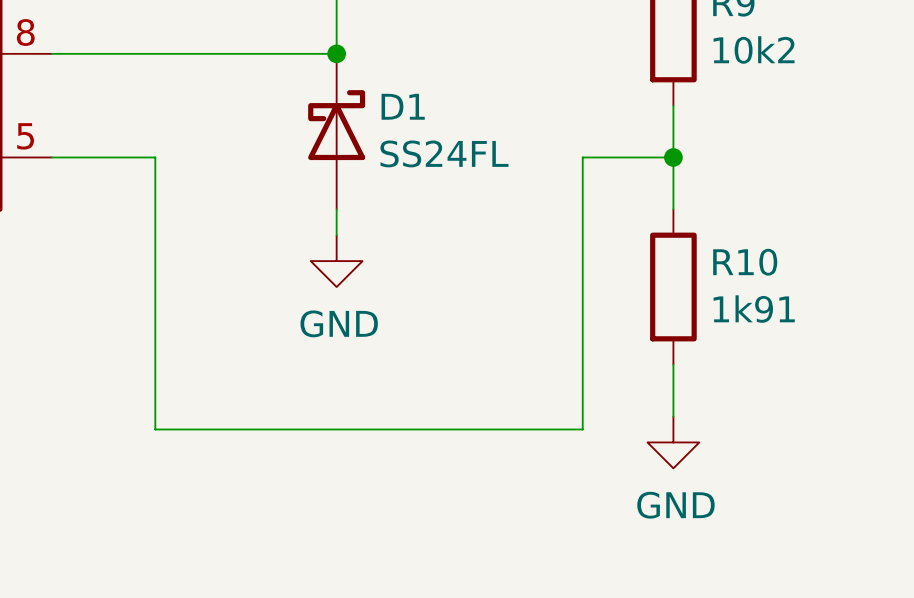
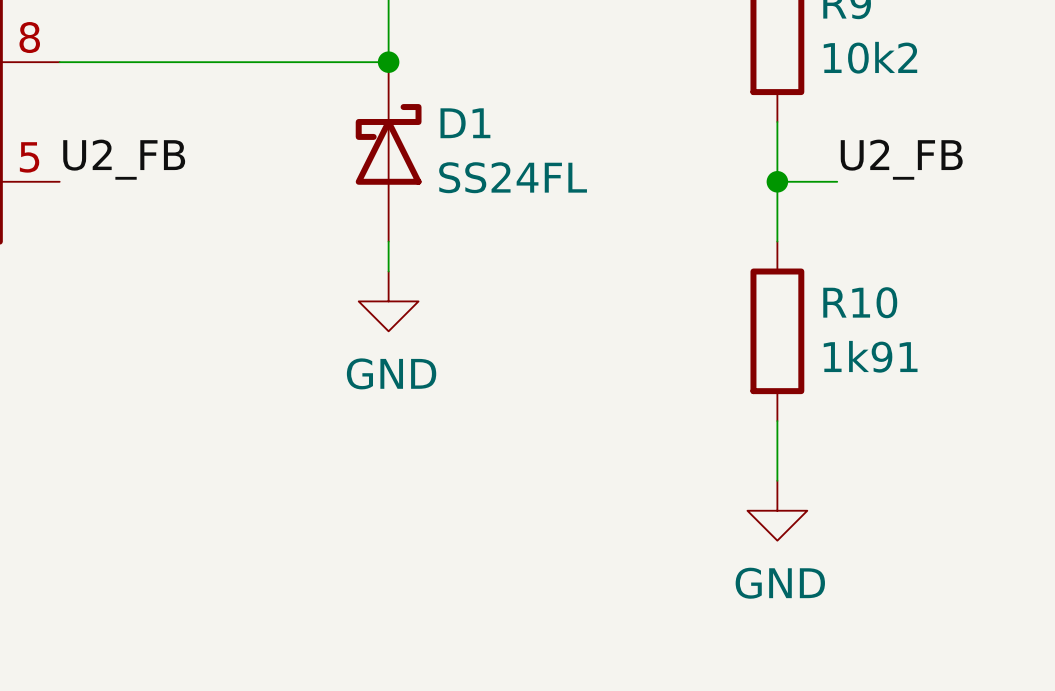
label: none -> U2_FB (124, 159)
label: none -> U2_FB (901, 159)
wire: (51, 157) (155, 157) (155, 429) (582, 429) (582, 157) (673, 157) -> (837, 181) (777, 181)

